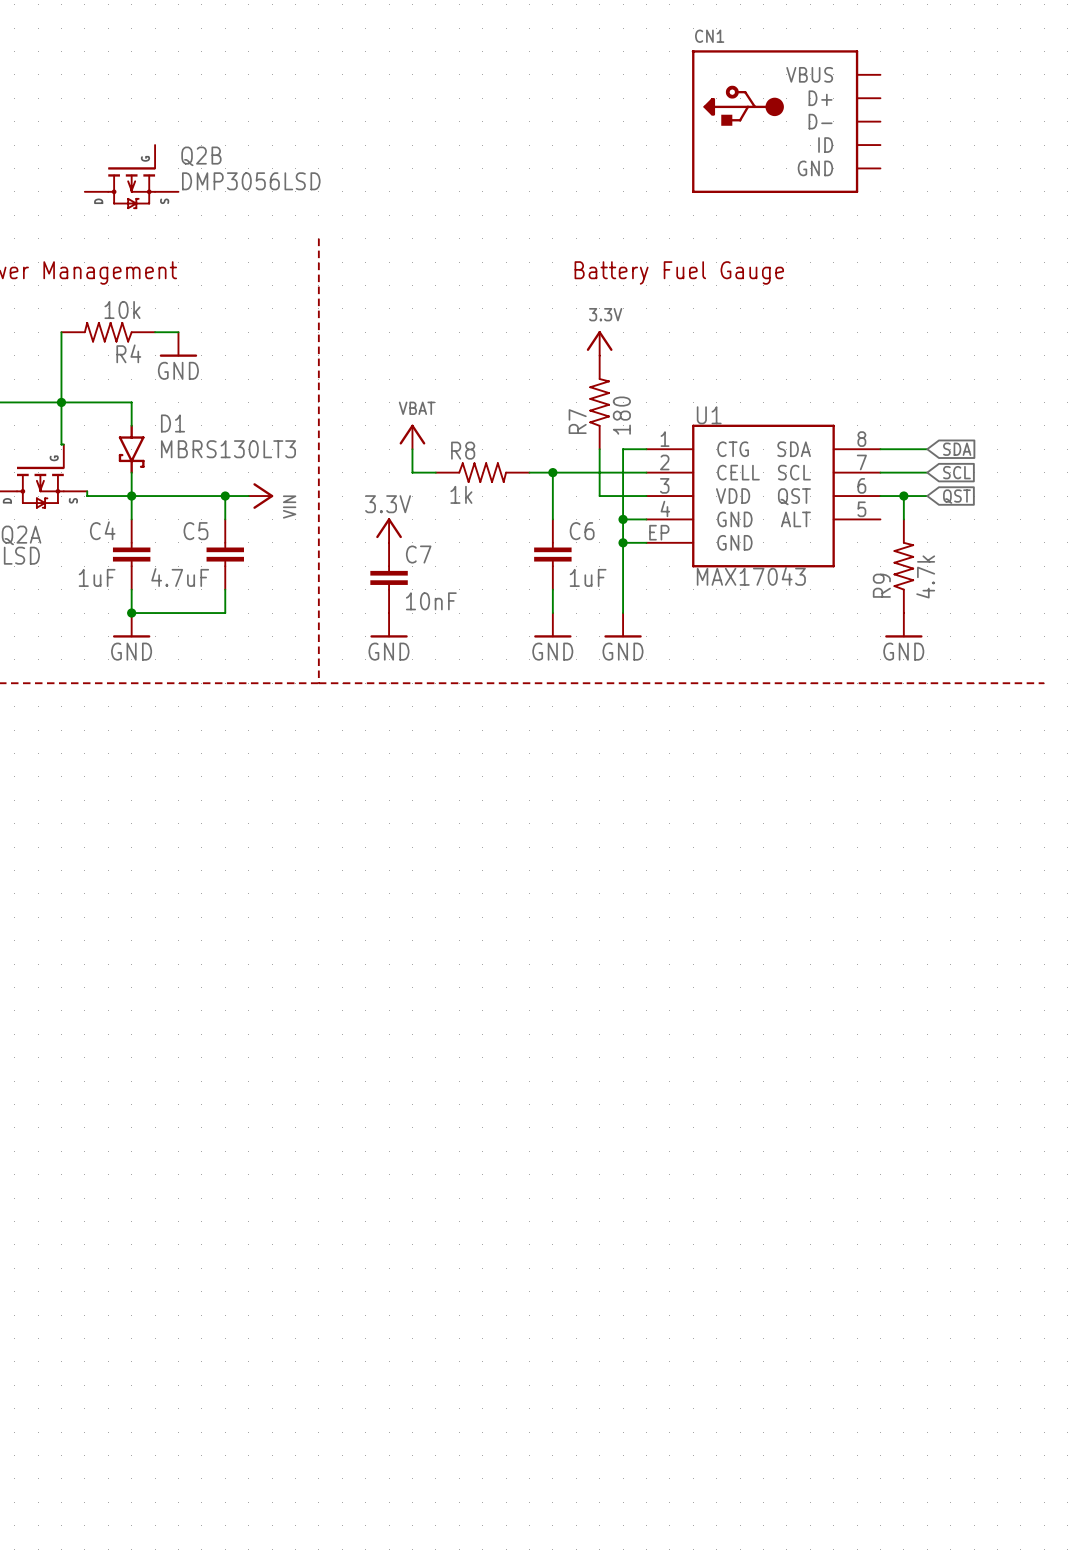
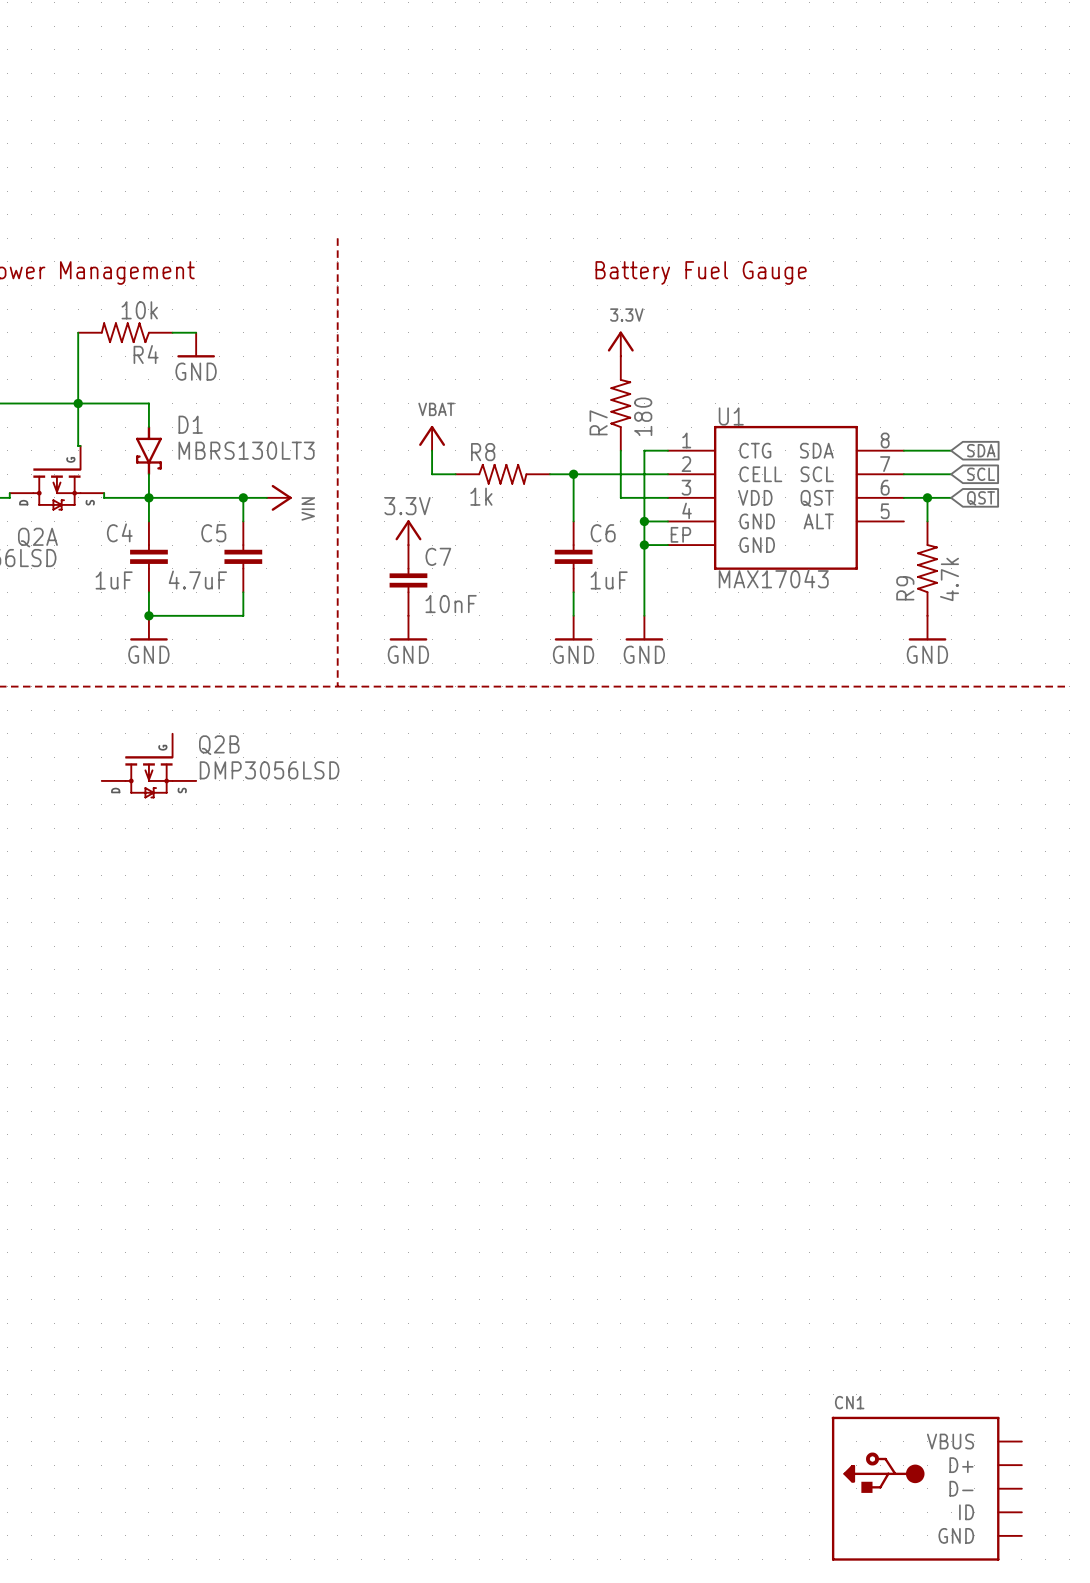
CN1 position: (786, 121) -> (926, 1488)
Q2B position: (131, 176) -> (148, 765)

